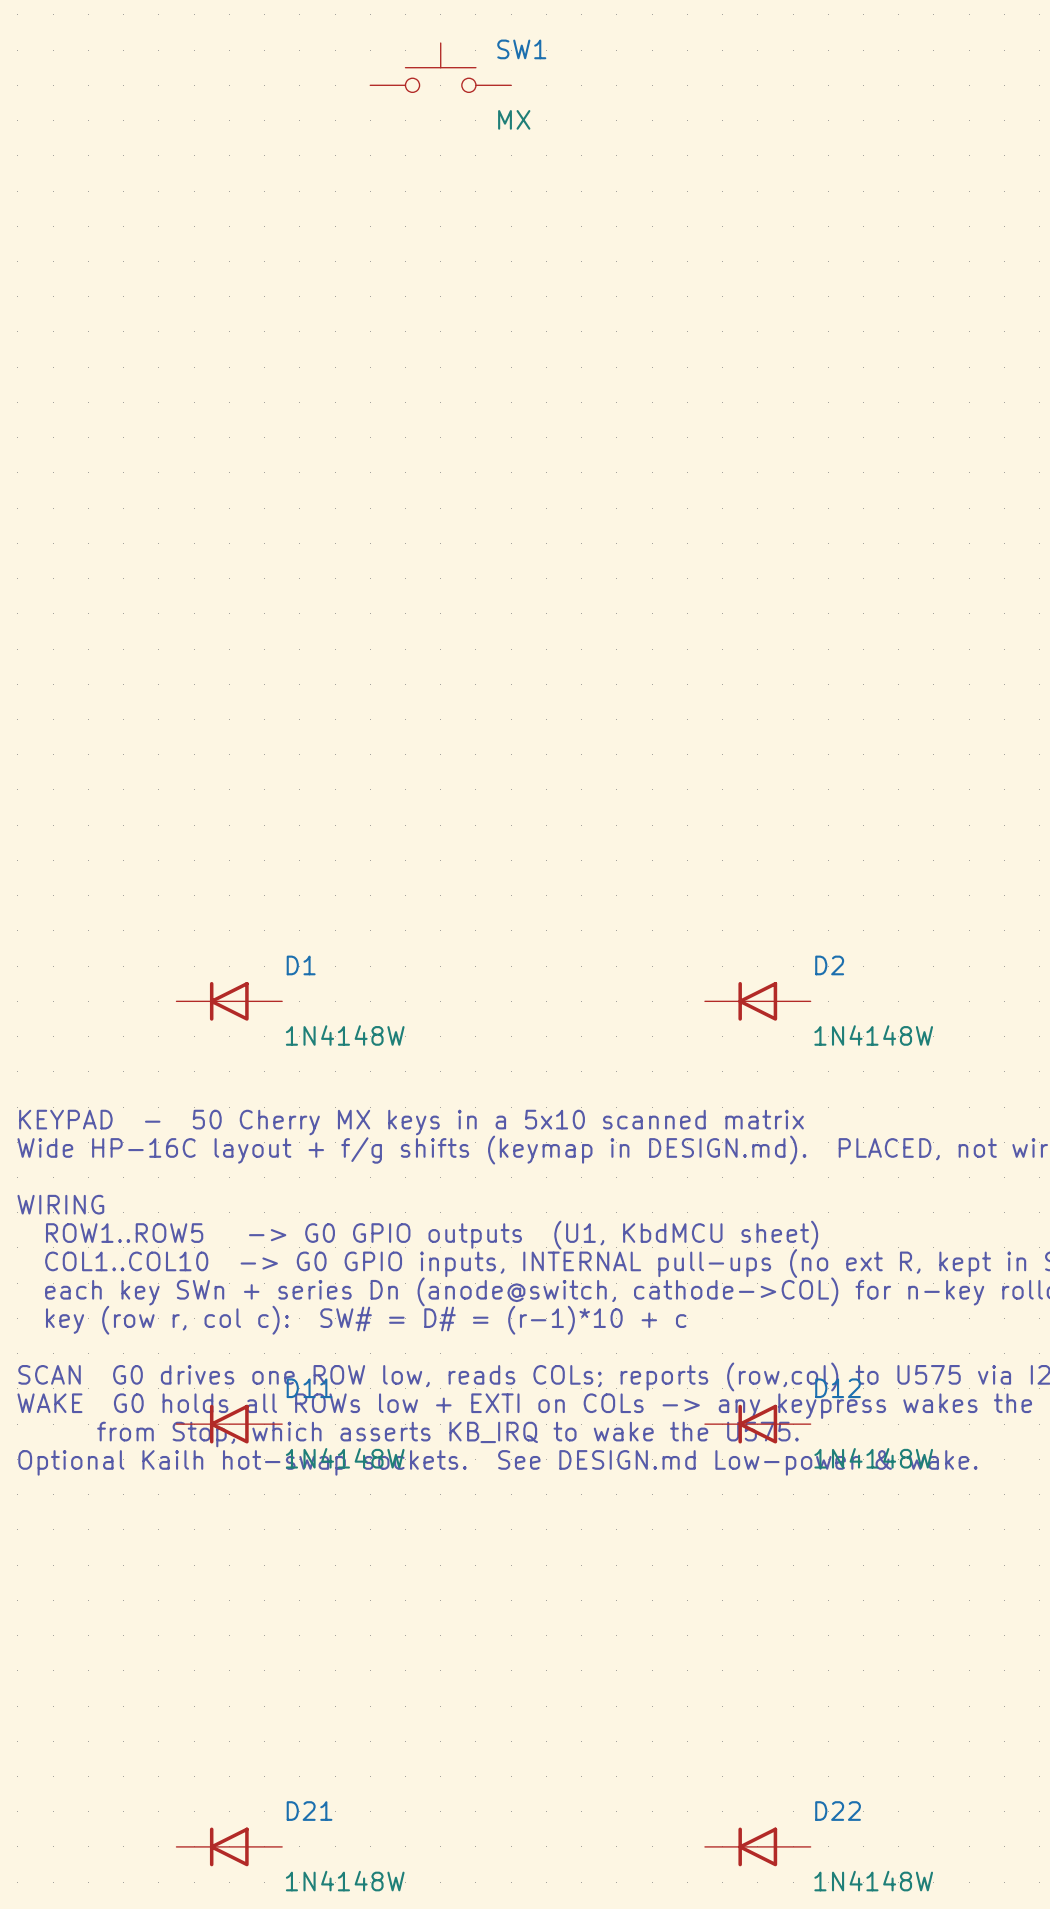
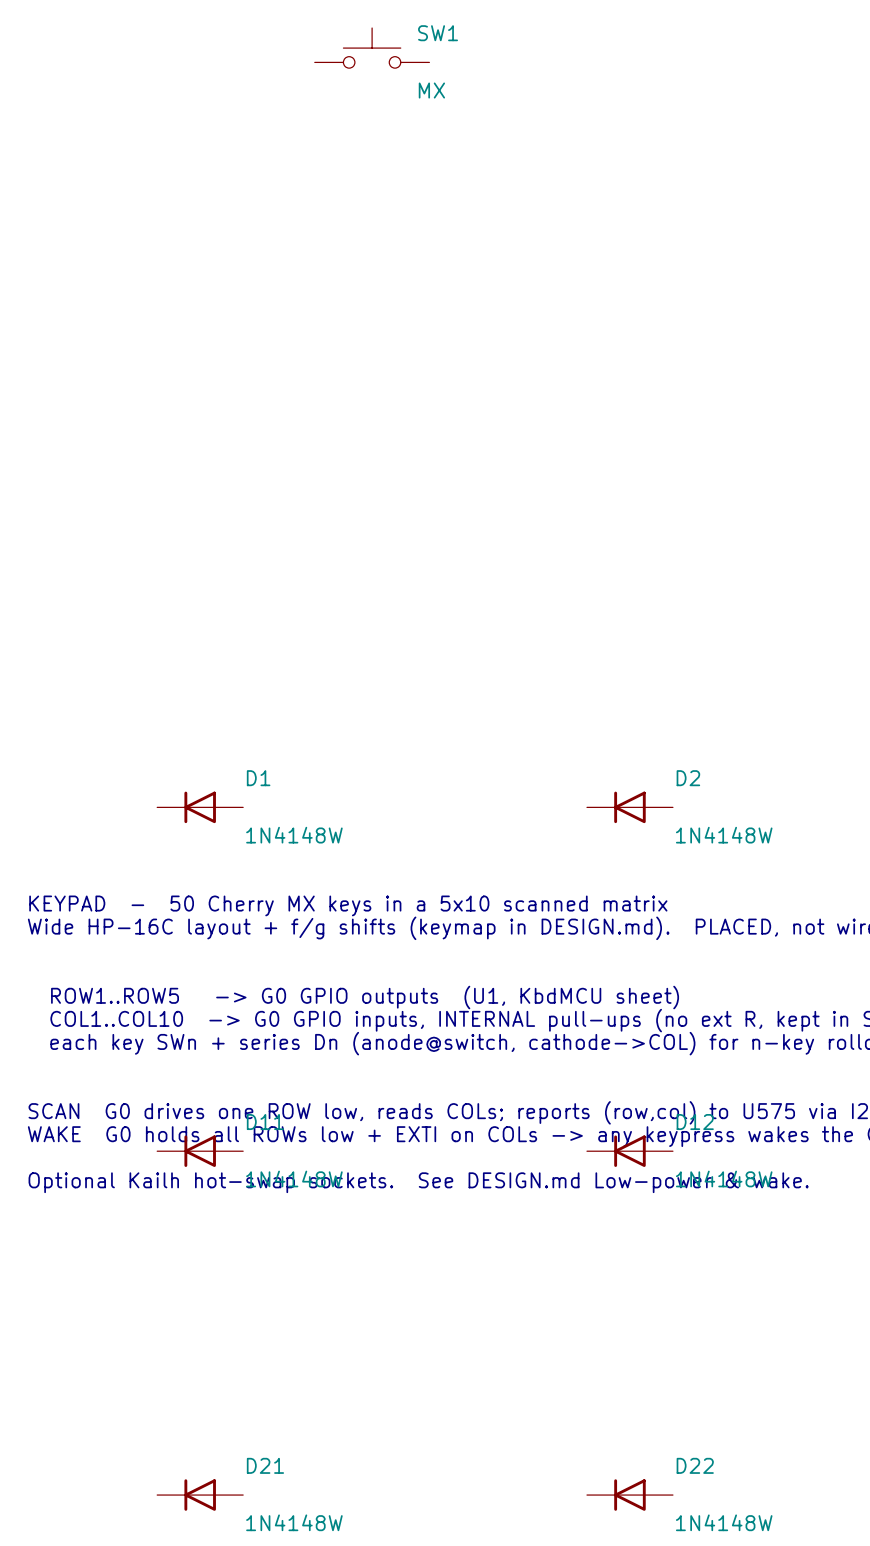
text: WIRING (60, 1204) -> none
text: key (row r, col c): SW# = D# = (r-1)*10 + c (366, 1320) -> none
text: from Stop, which asserts KB_IRQ to wake the U575. (447, 1434) -> none

